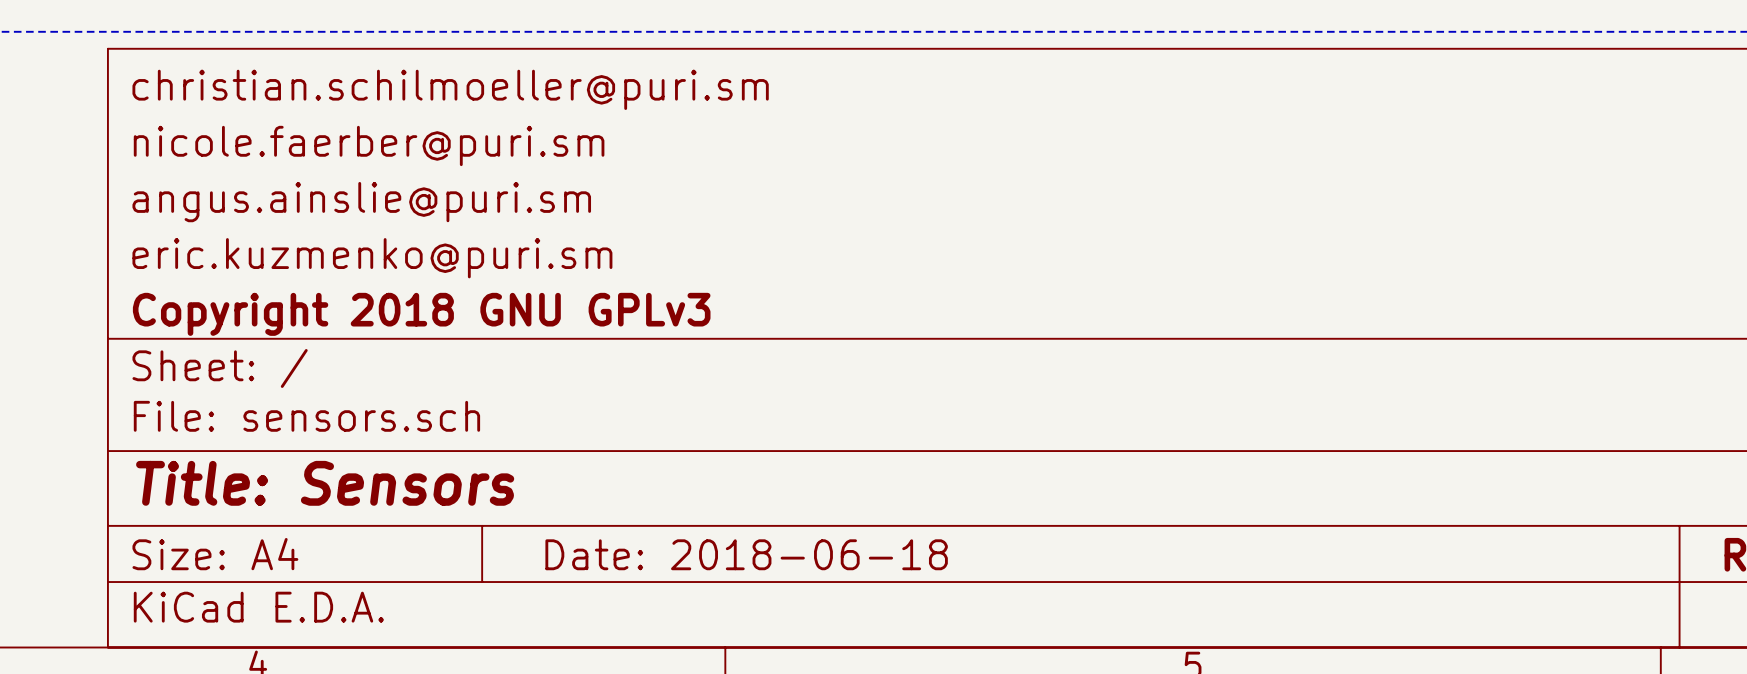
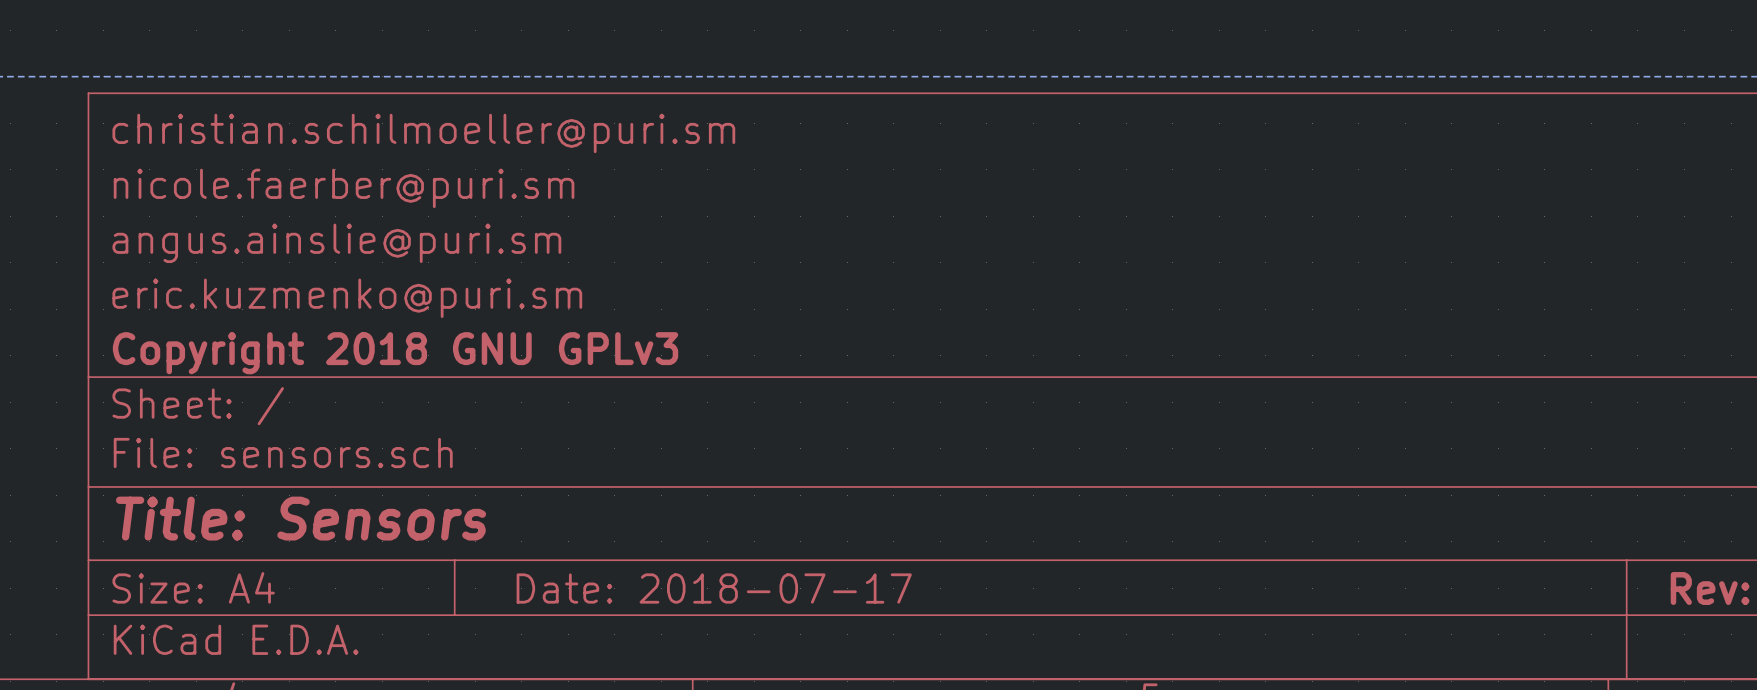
title block: Date: 2018-06-18 (746, 554) -> Date: 2018-07-17 (714, 588)

